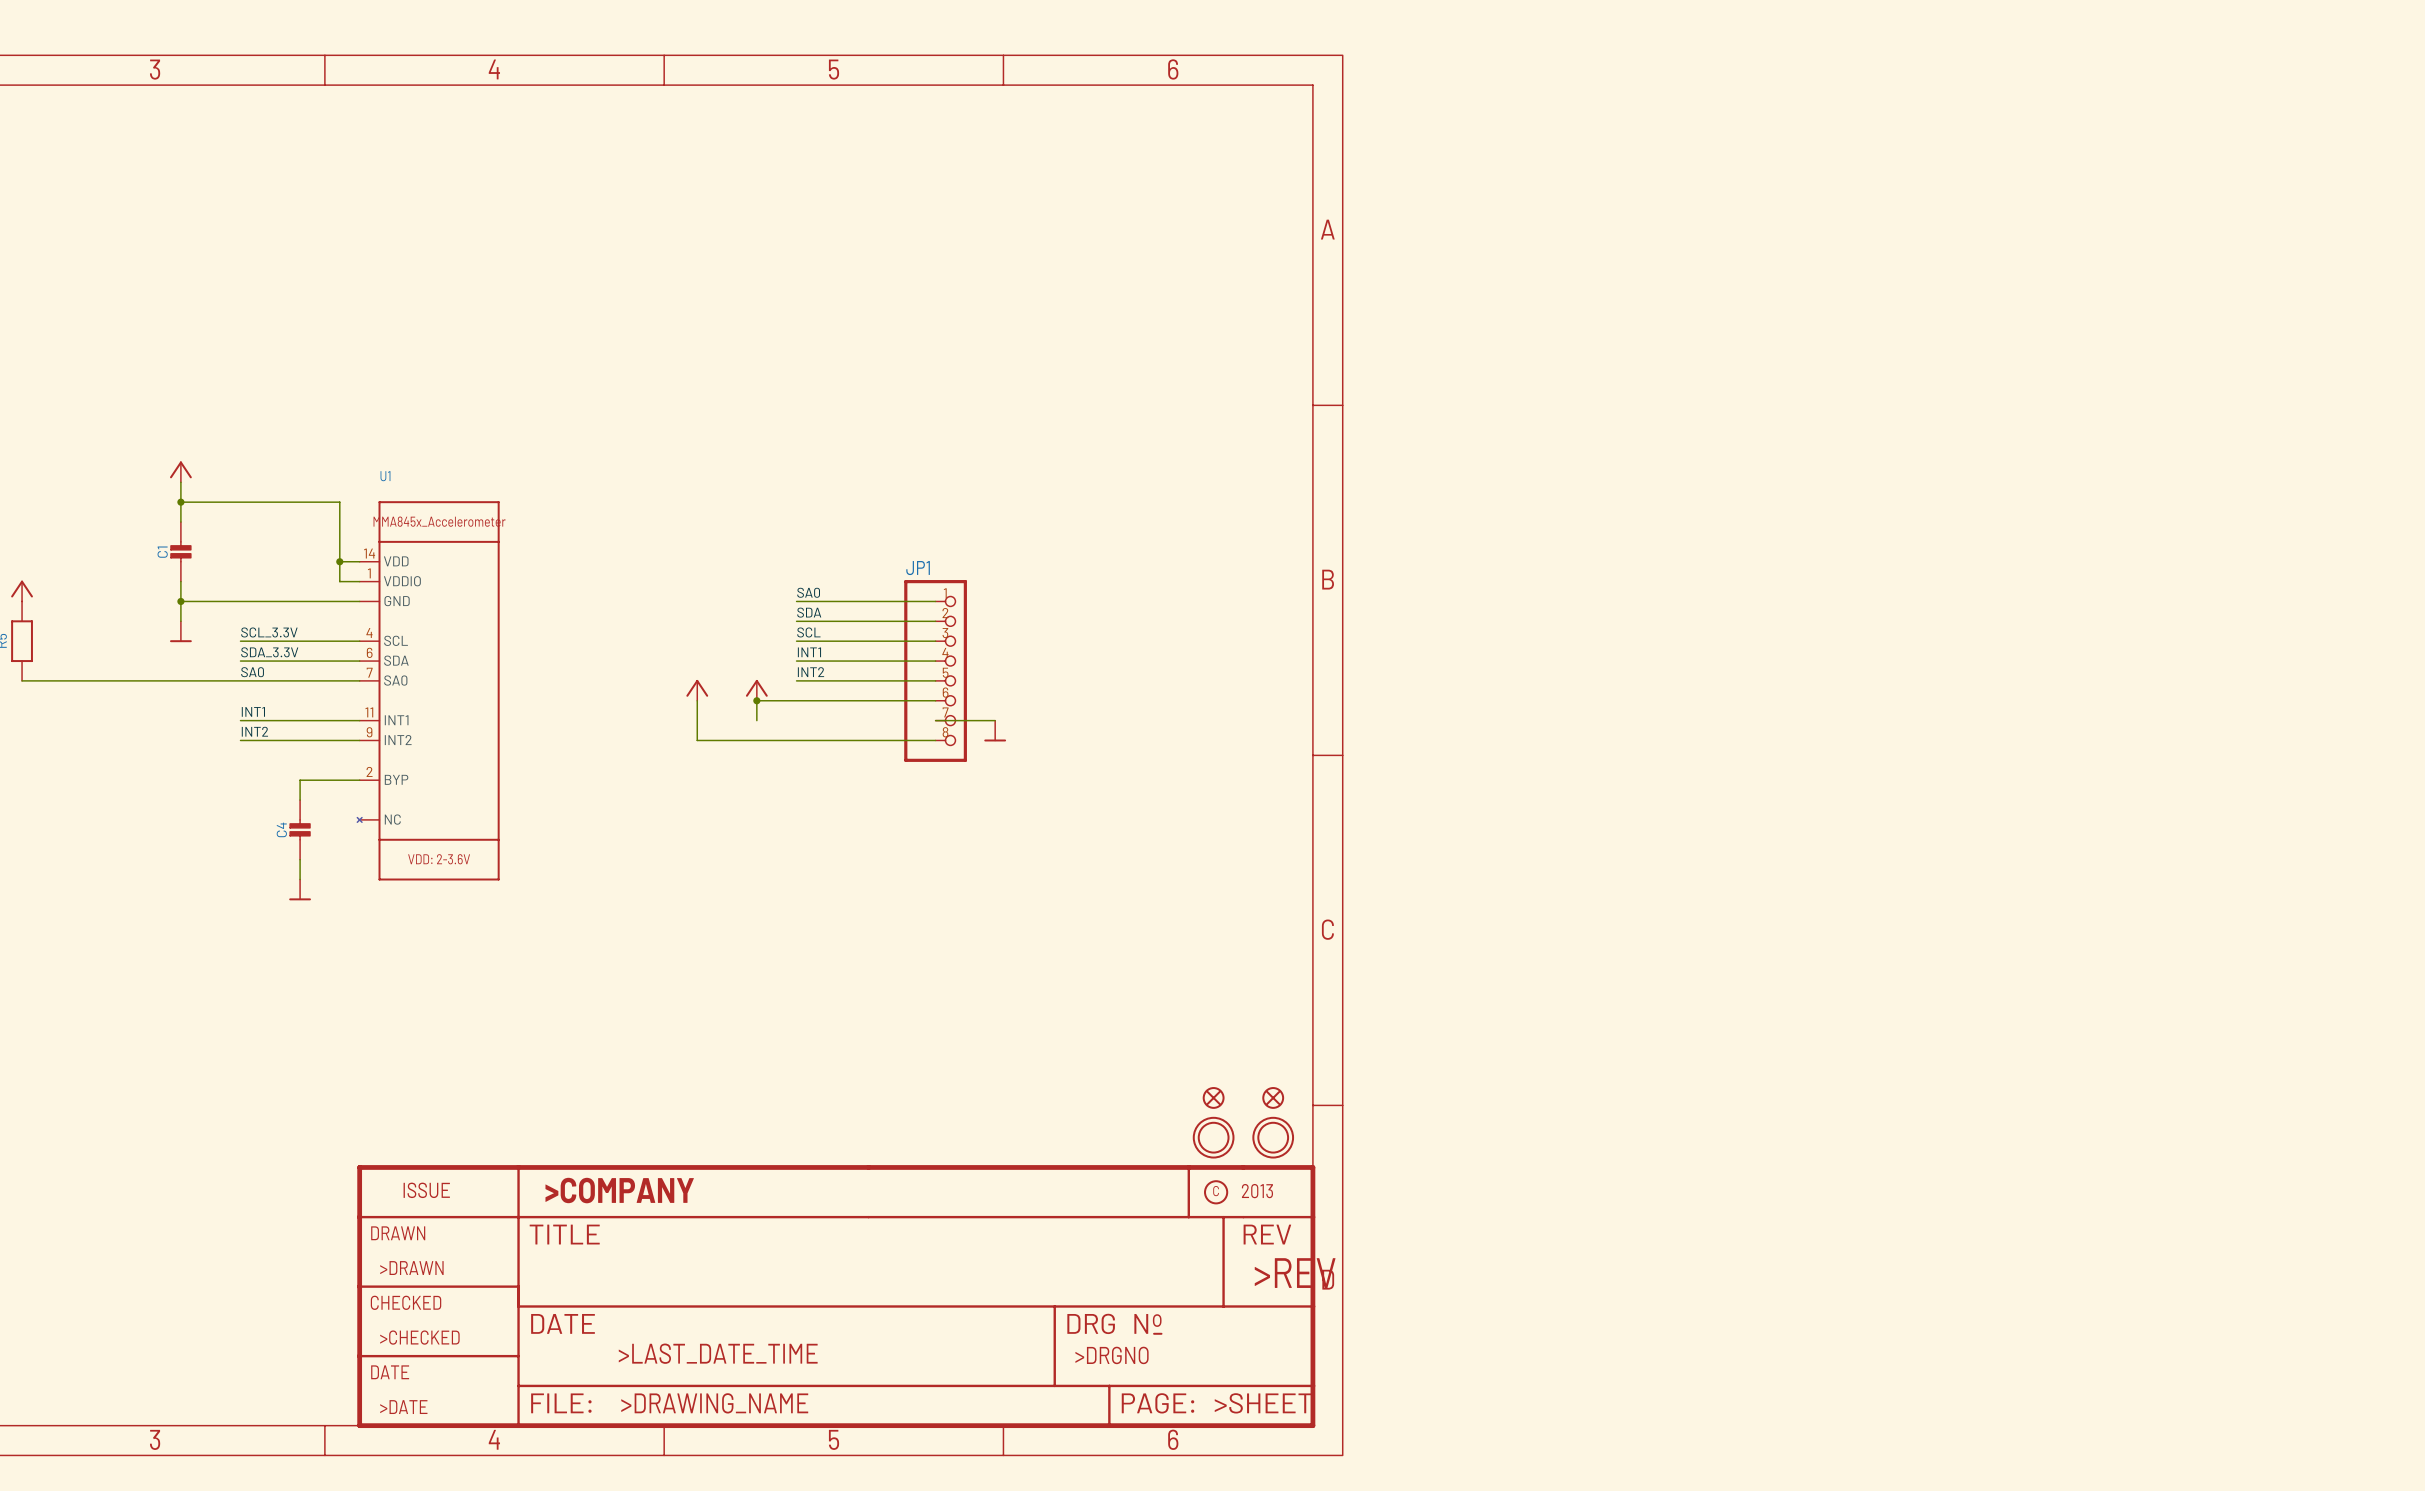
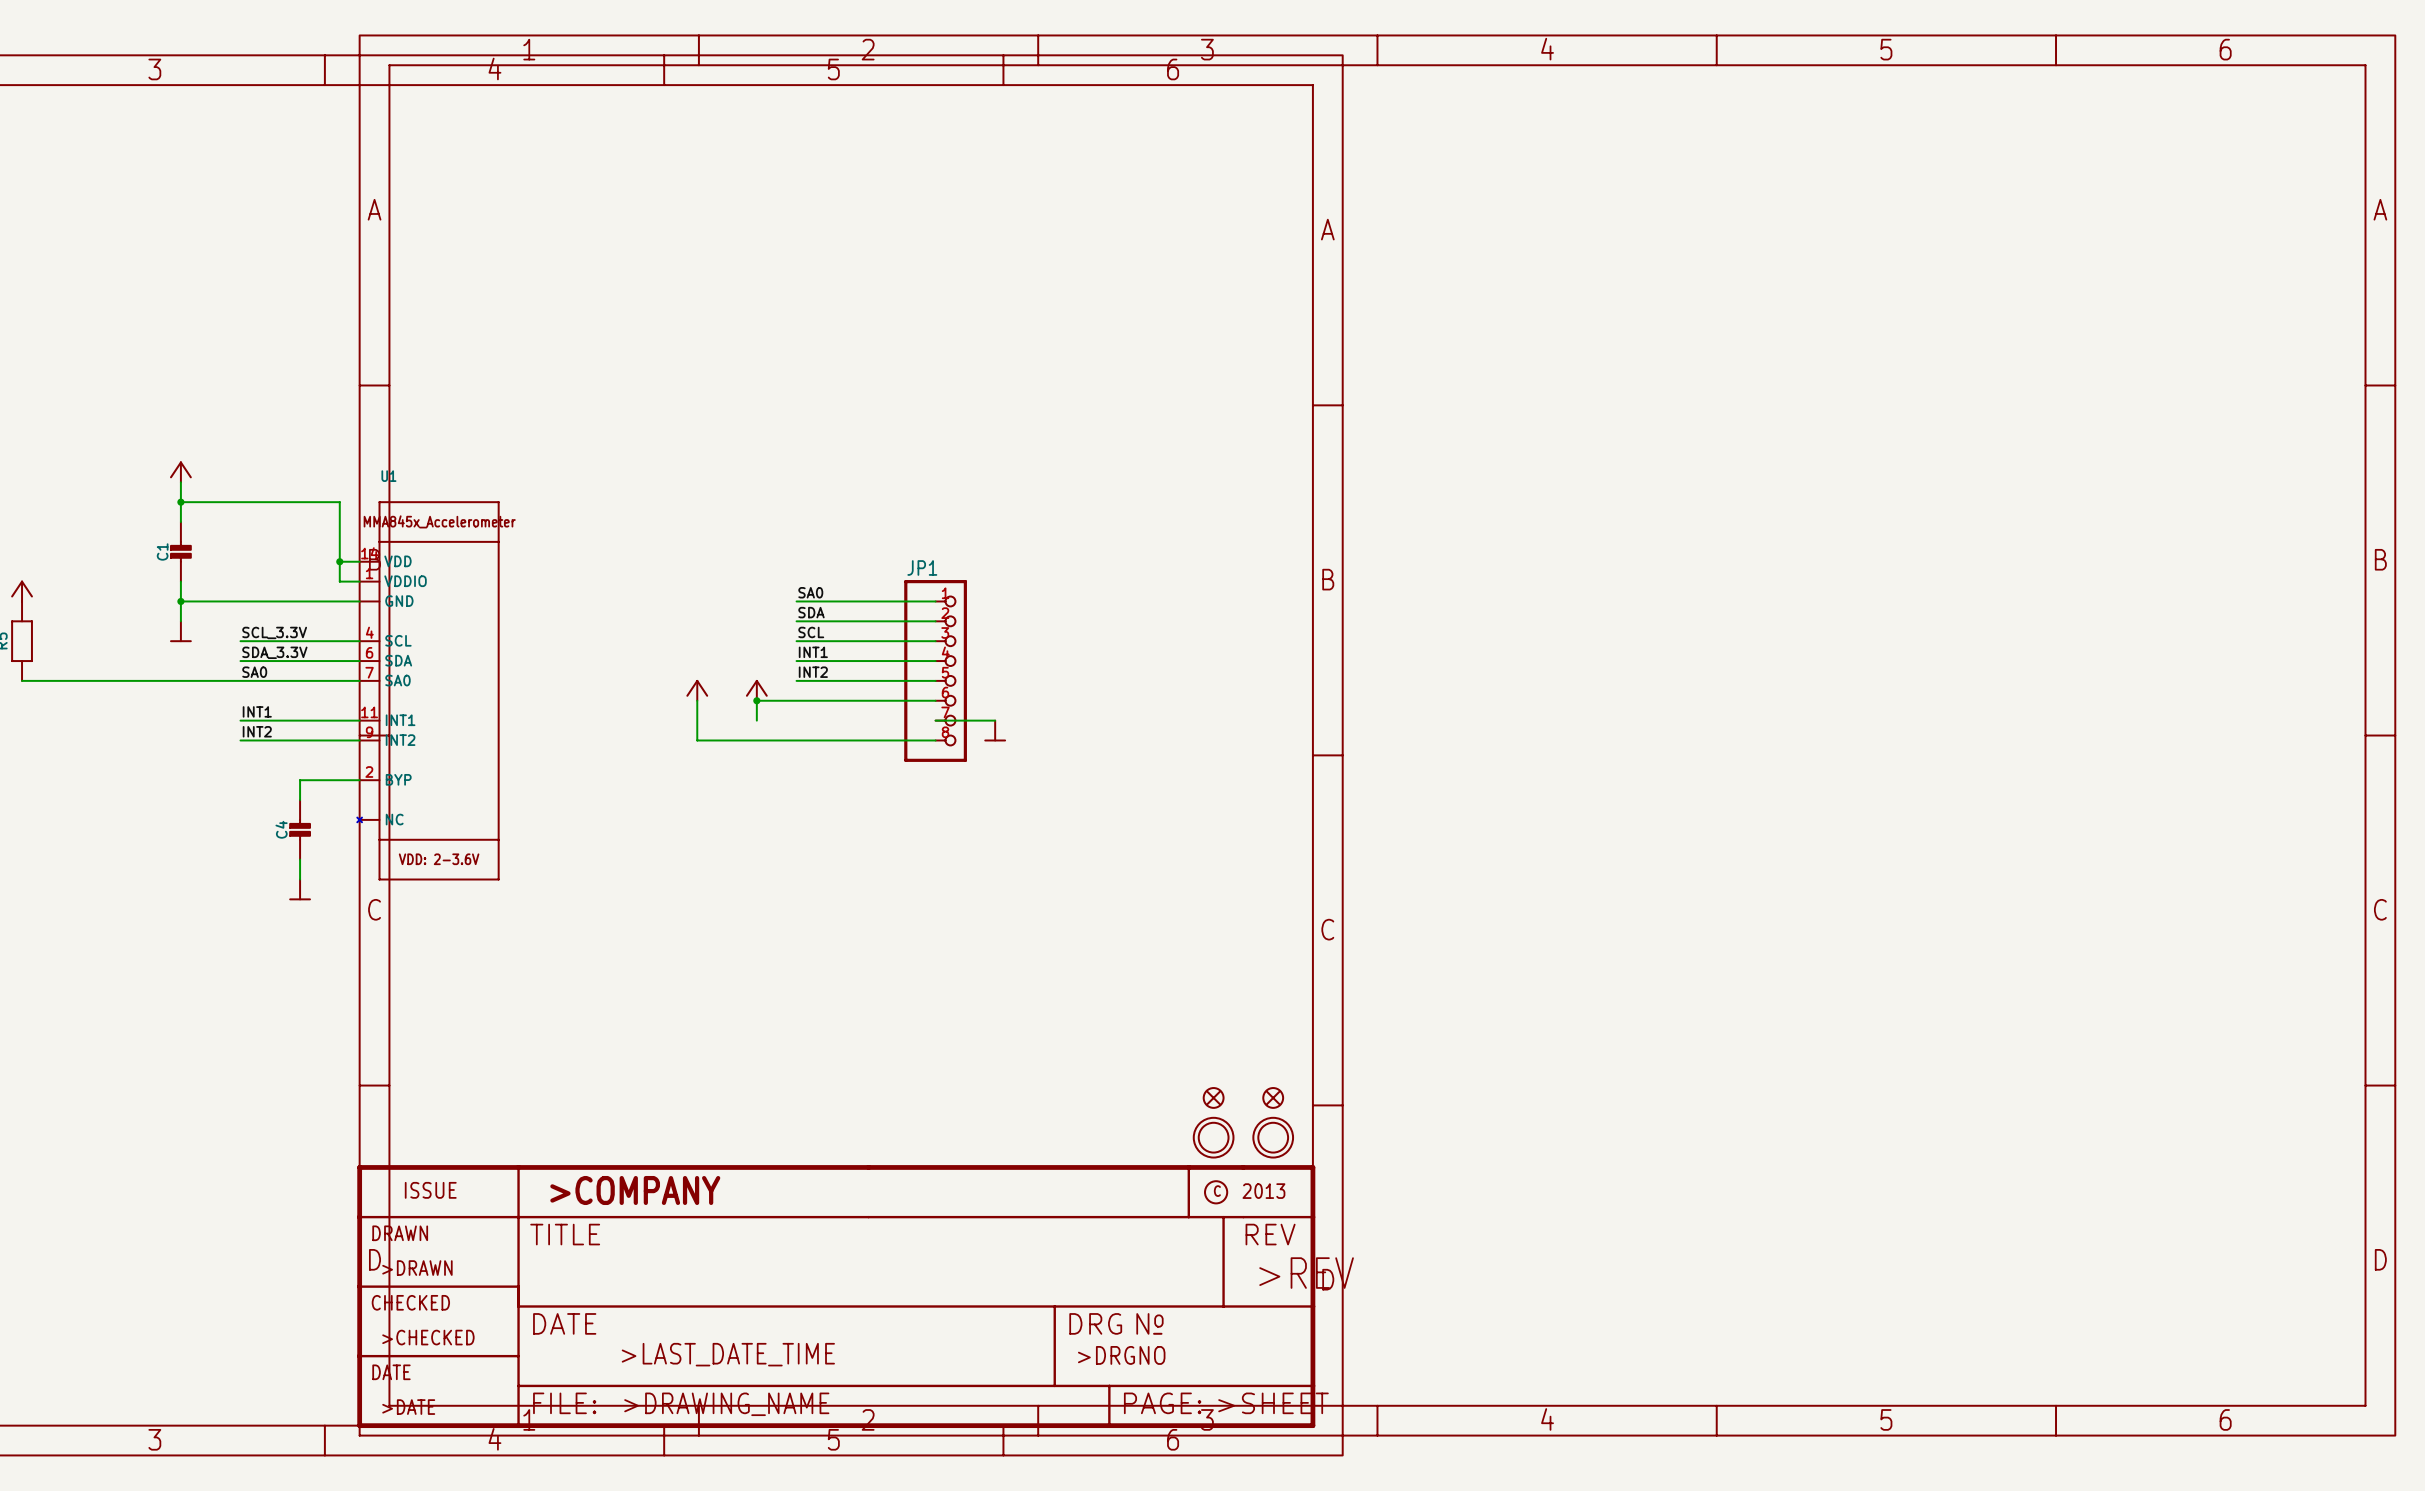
power symbol: none -> (1376, 735)
power symbol: (836, 1296) -> none

